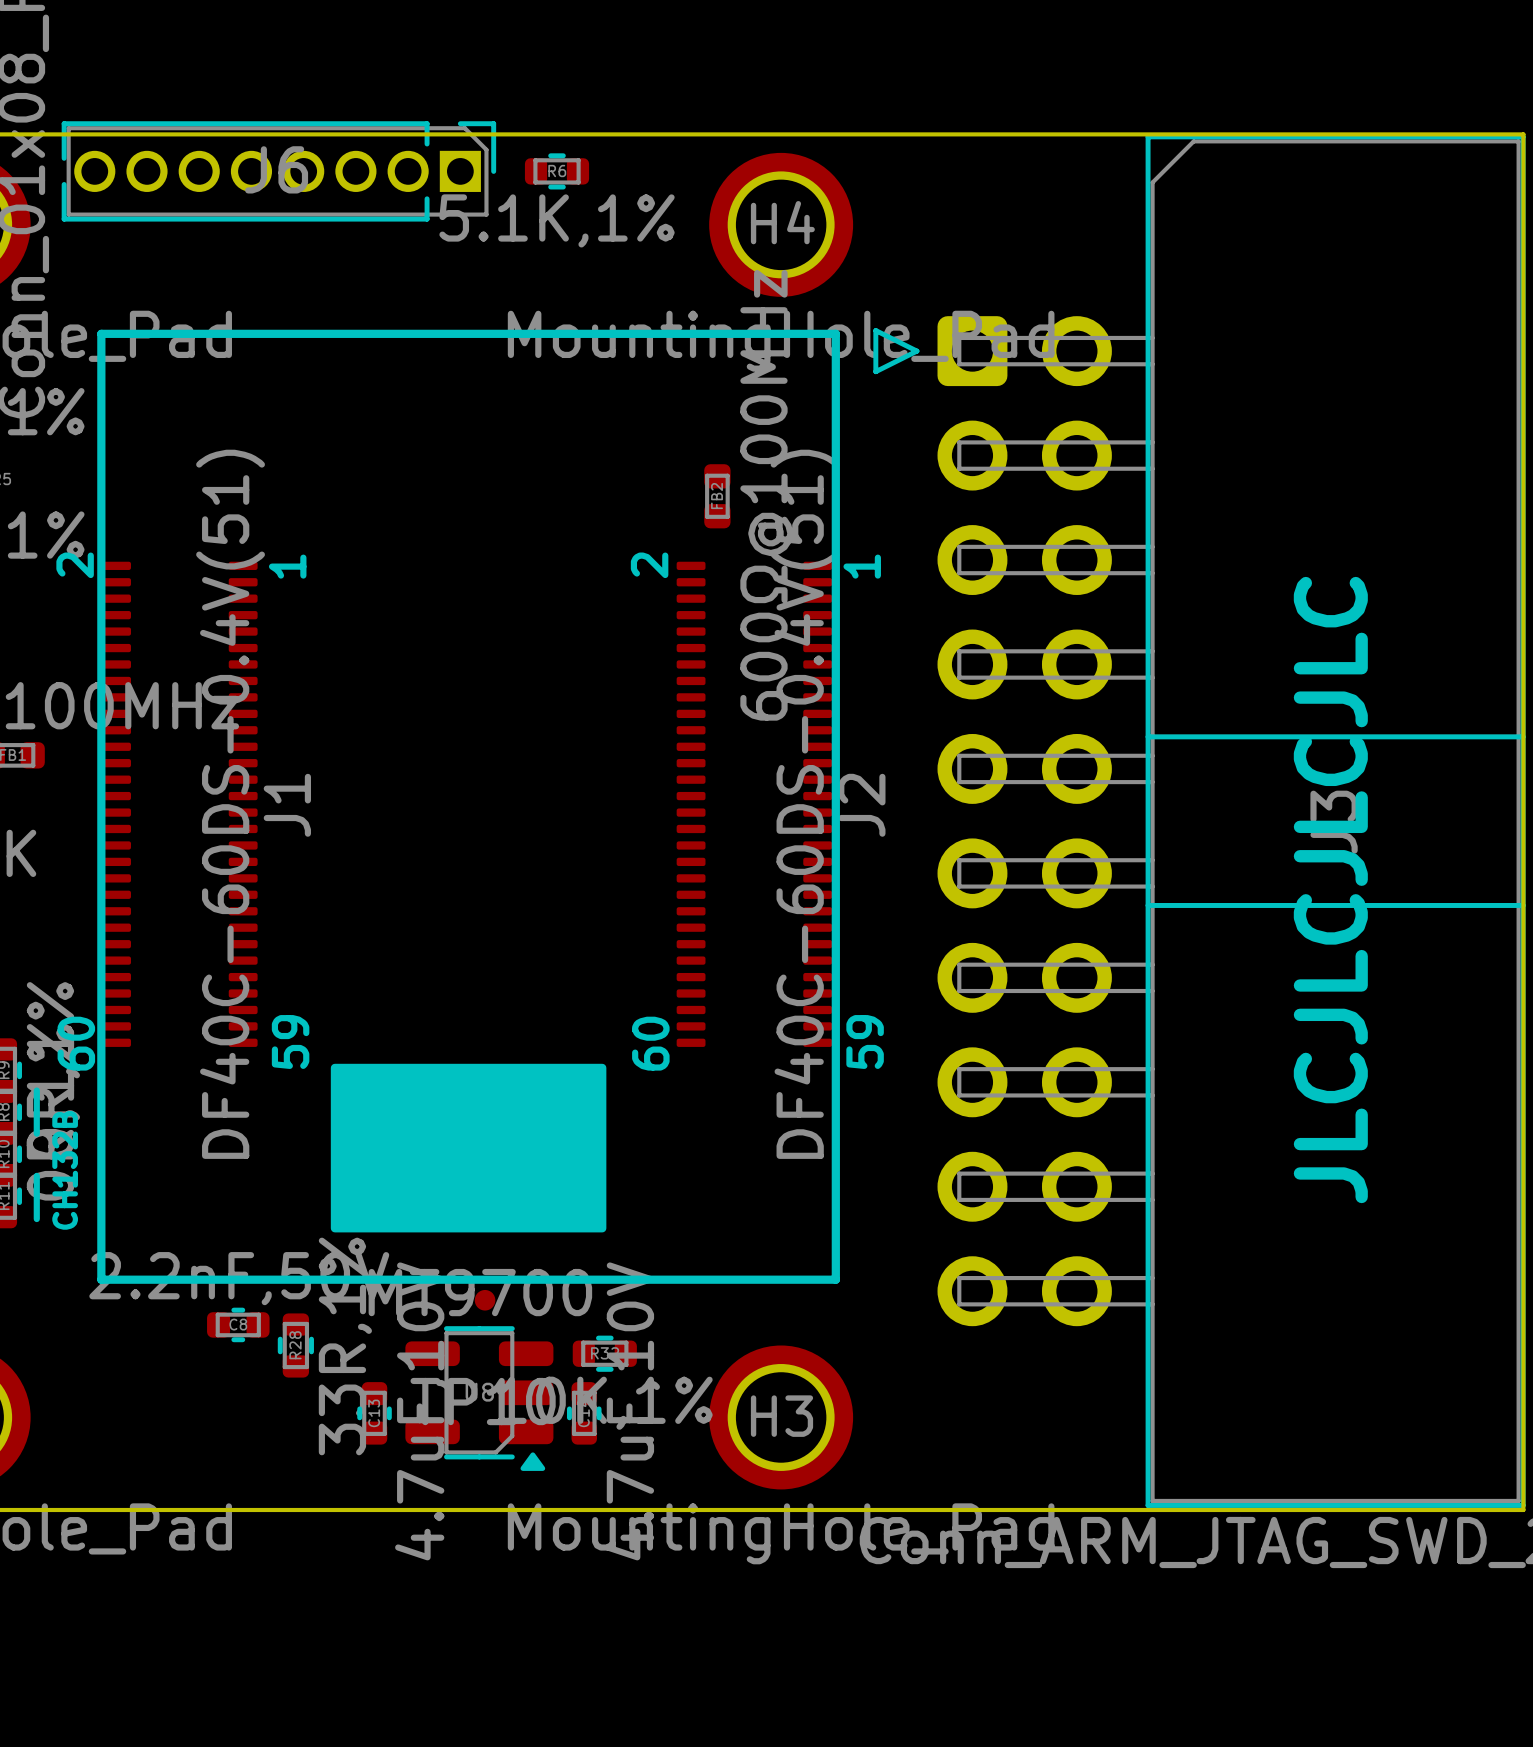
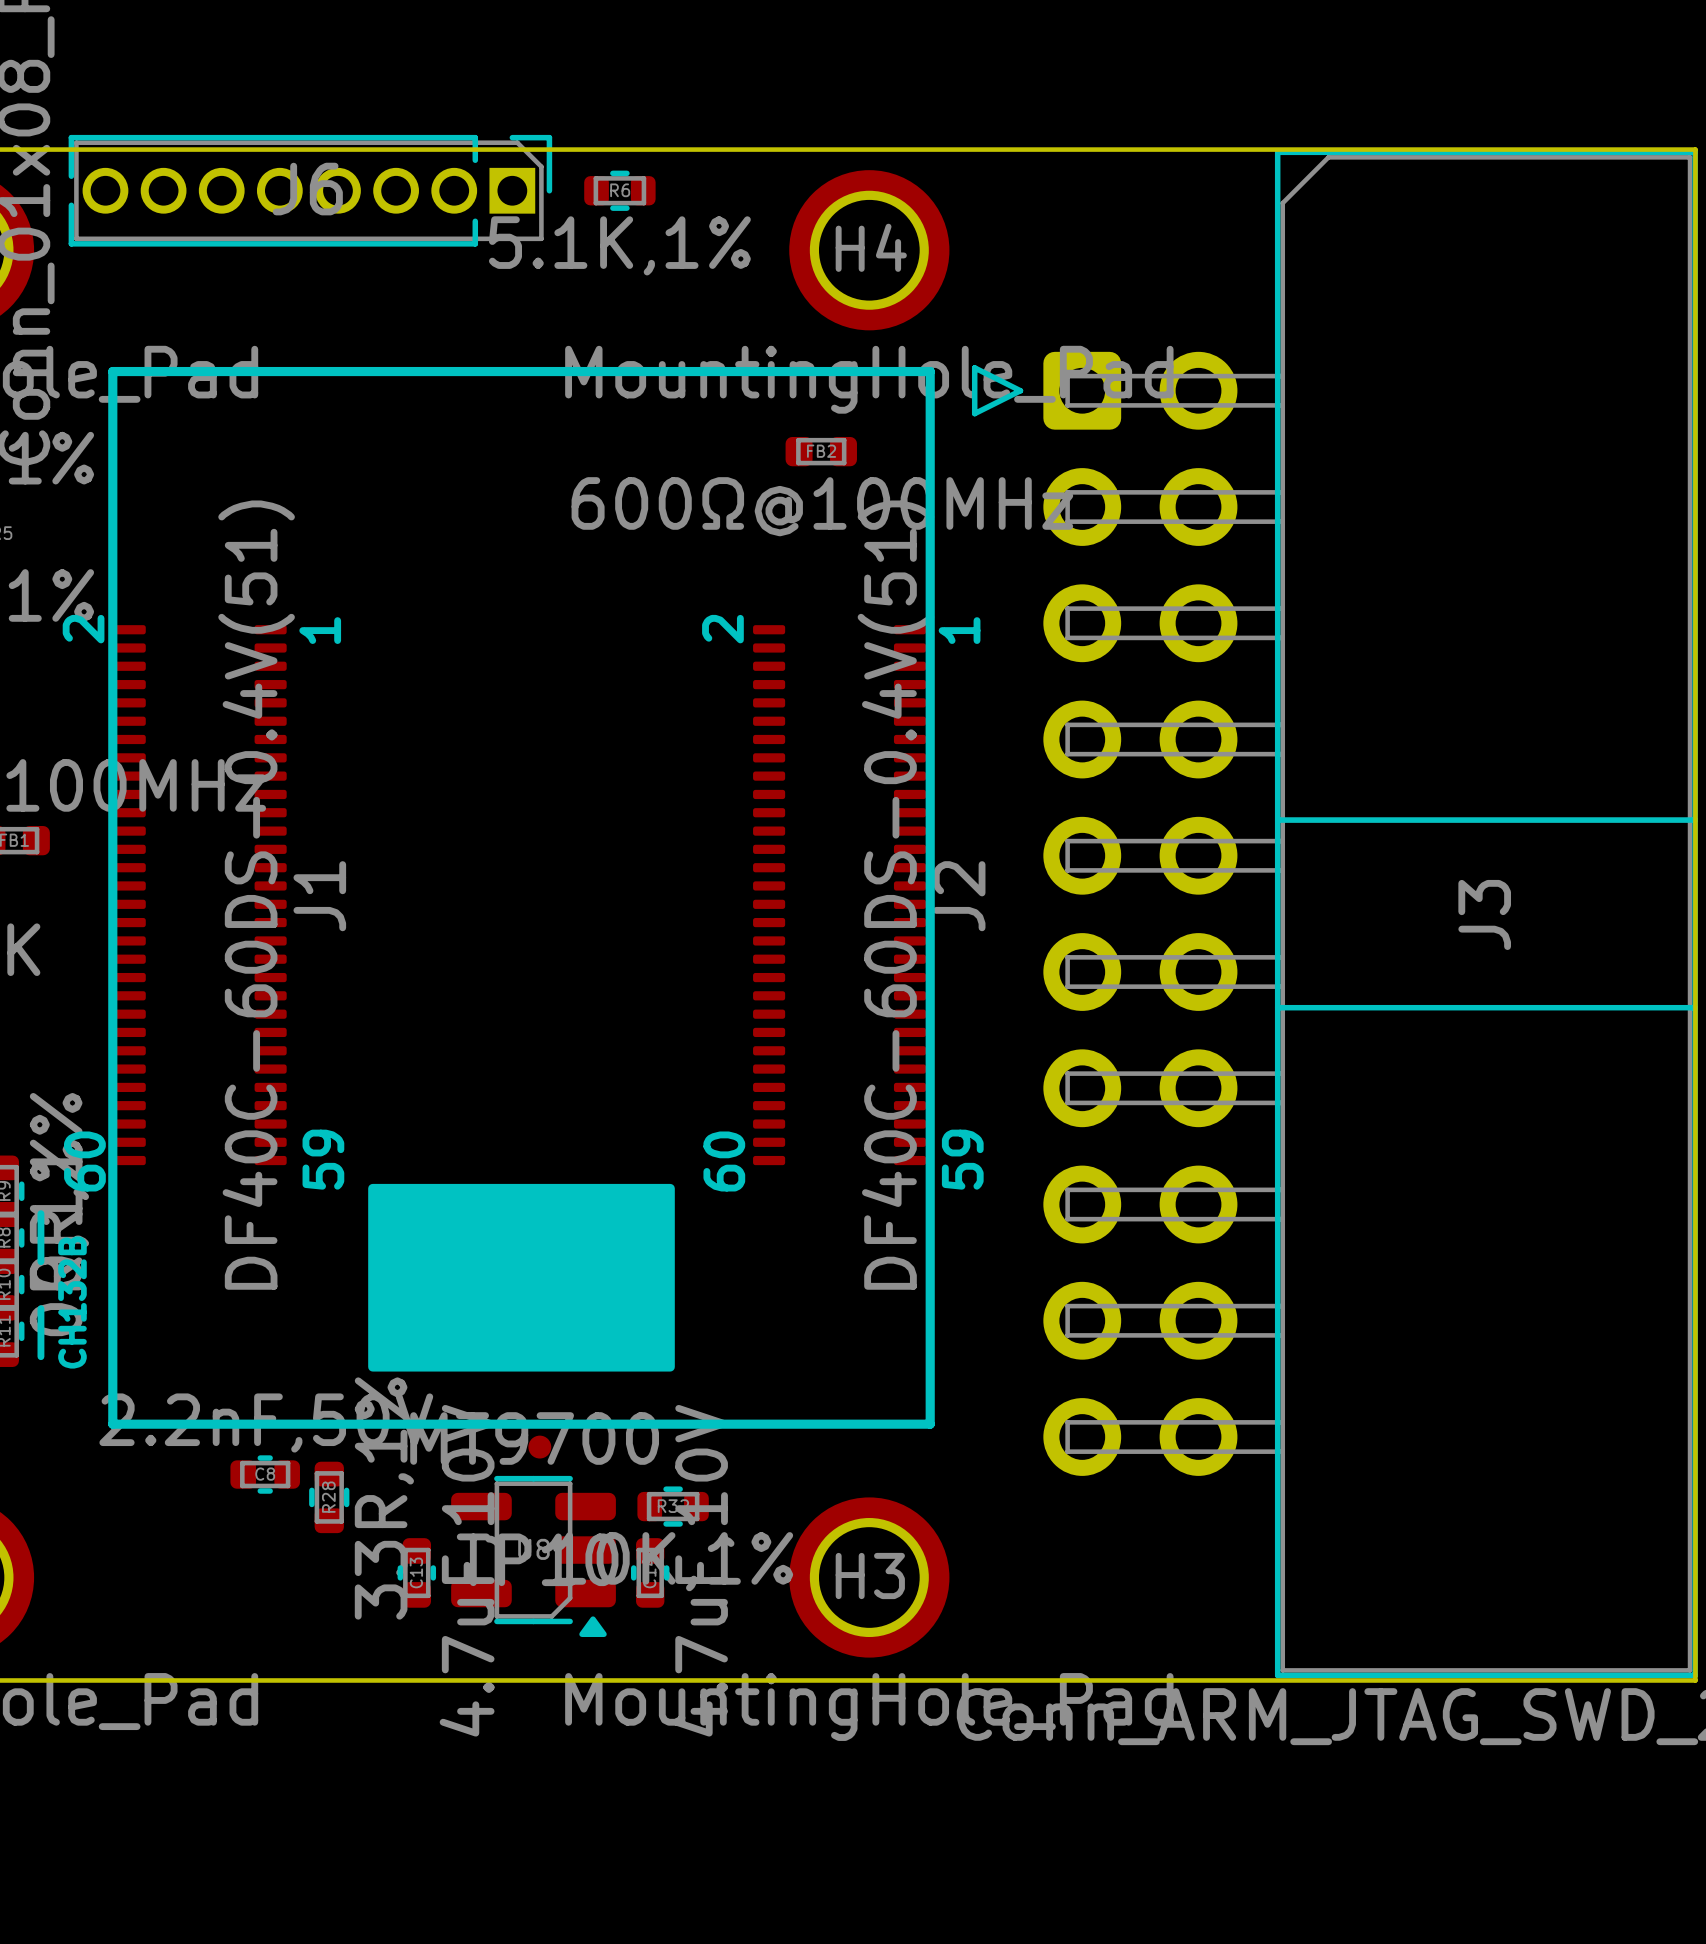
FB2 rotation: 0° (717, 496) -> 90° clockwise (821, 451)
FB2 position: (717, 496) -> (821, 451)
text: JLCJLCJLCJLC (1330, 890) -> none

